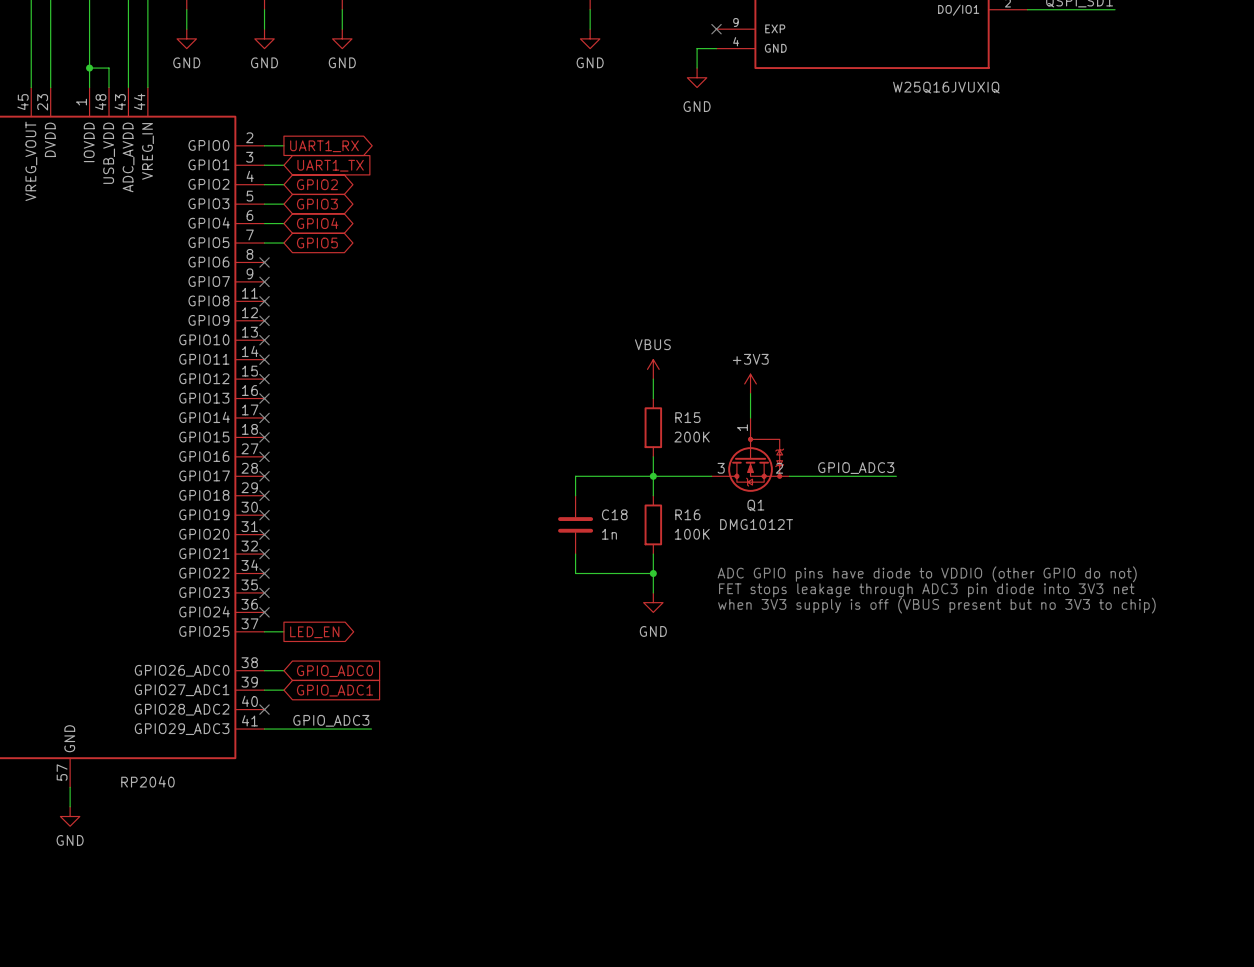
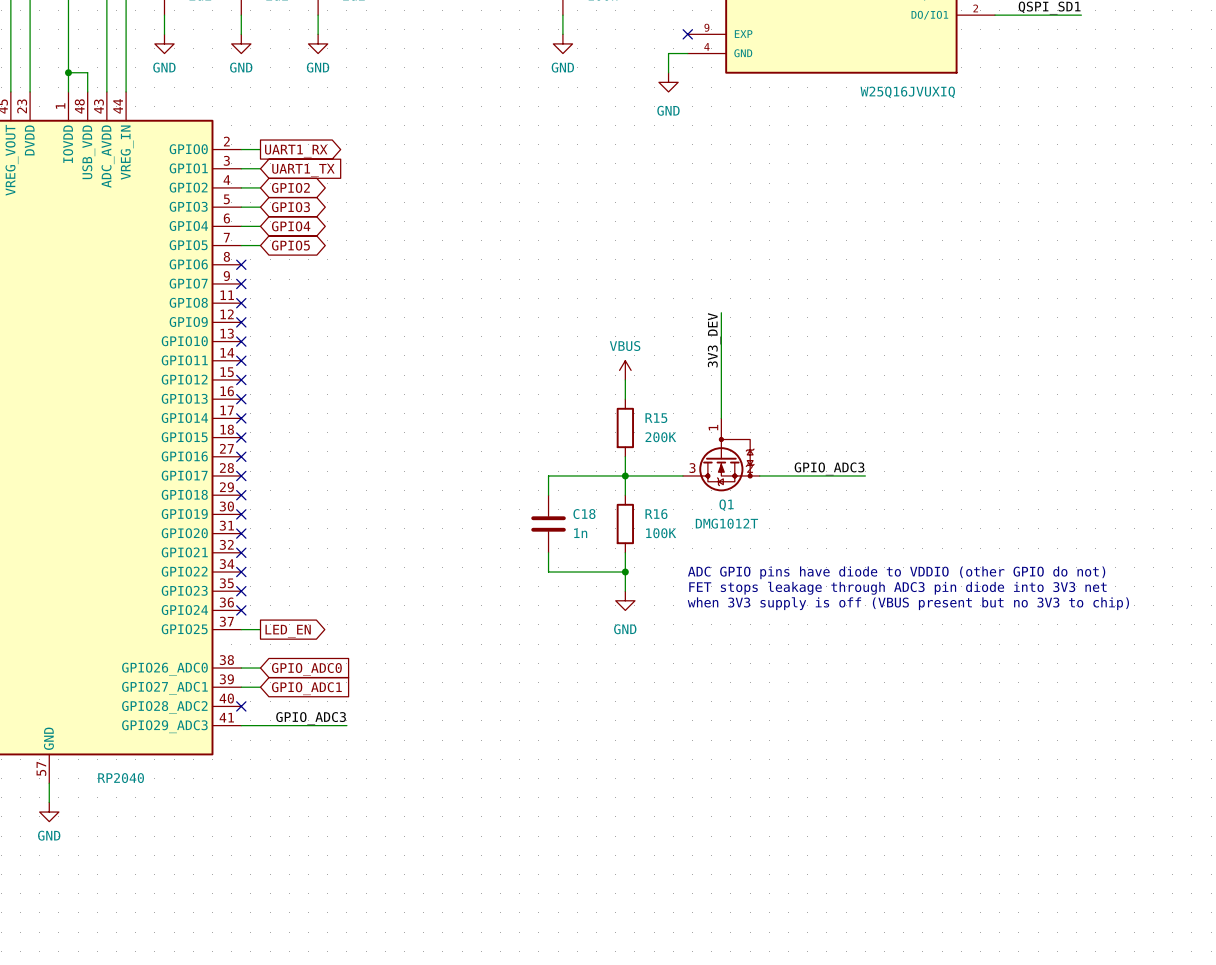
wire: none -> (721, 312) (721, 394)
label: none -> 3V3_DEV (714, 340)
power symbol: +3V3 (750, 383) -> none

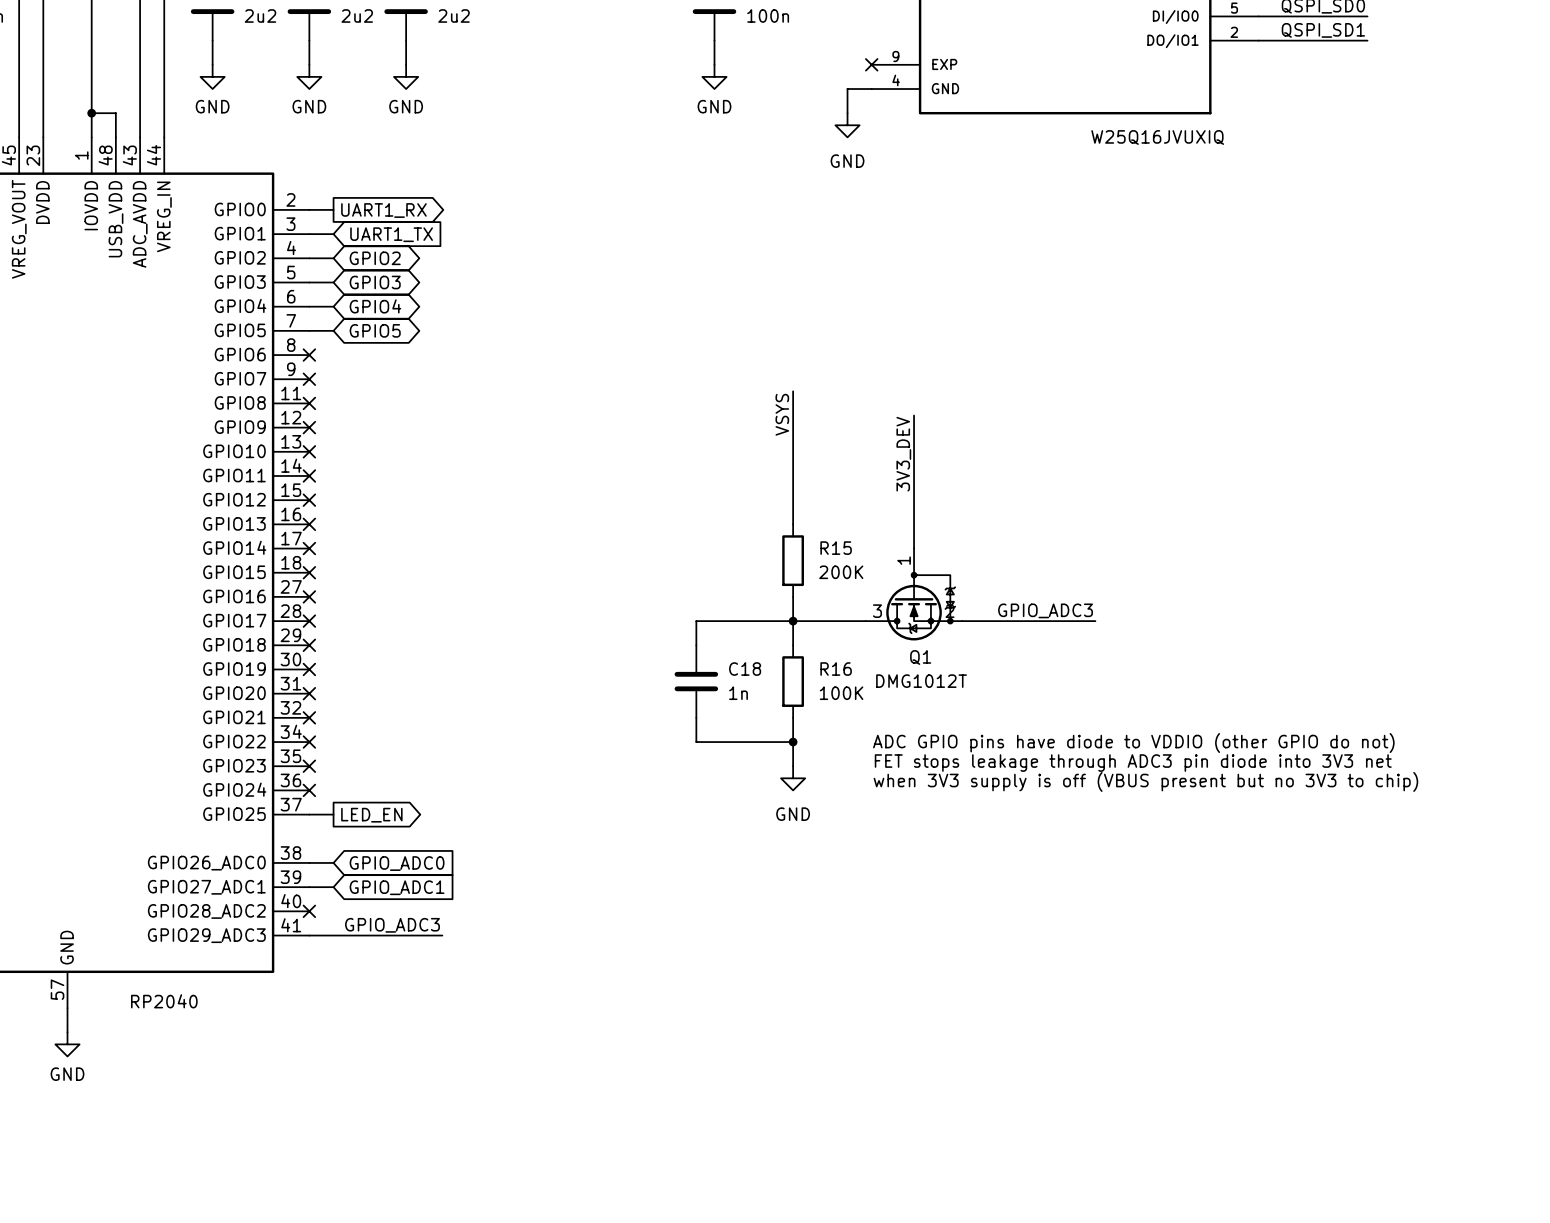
wire: none -> (793, 391) (793, 500)
label: none -> VSYS (782, 414)
power symbol: VBUS (625, 370) -> none

